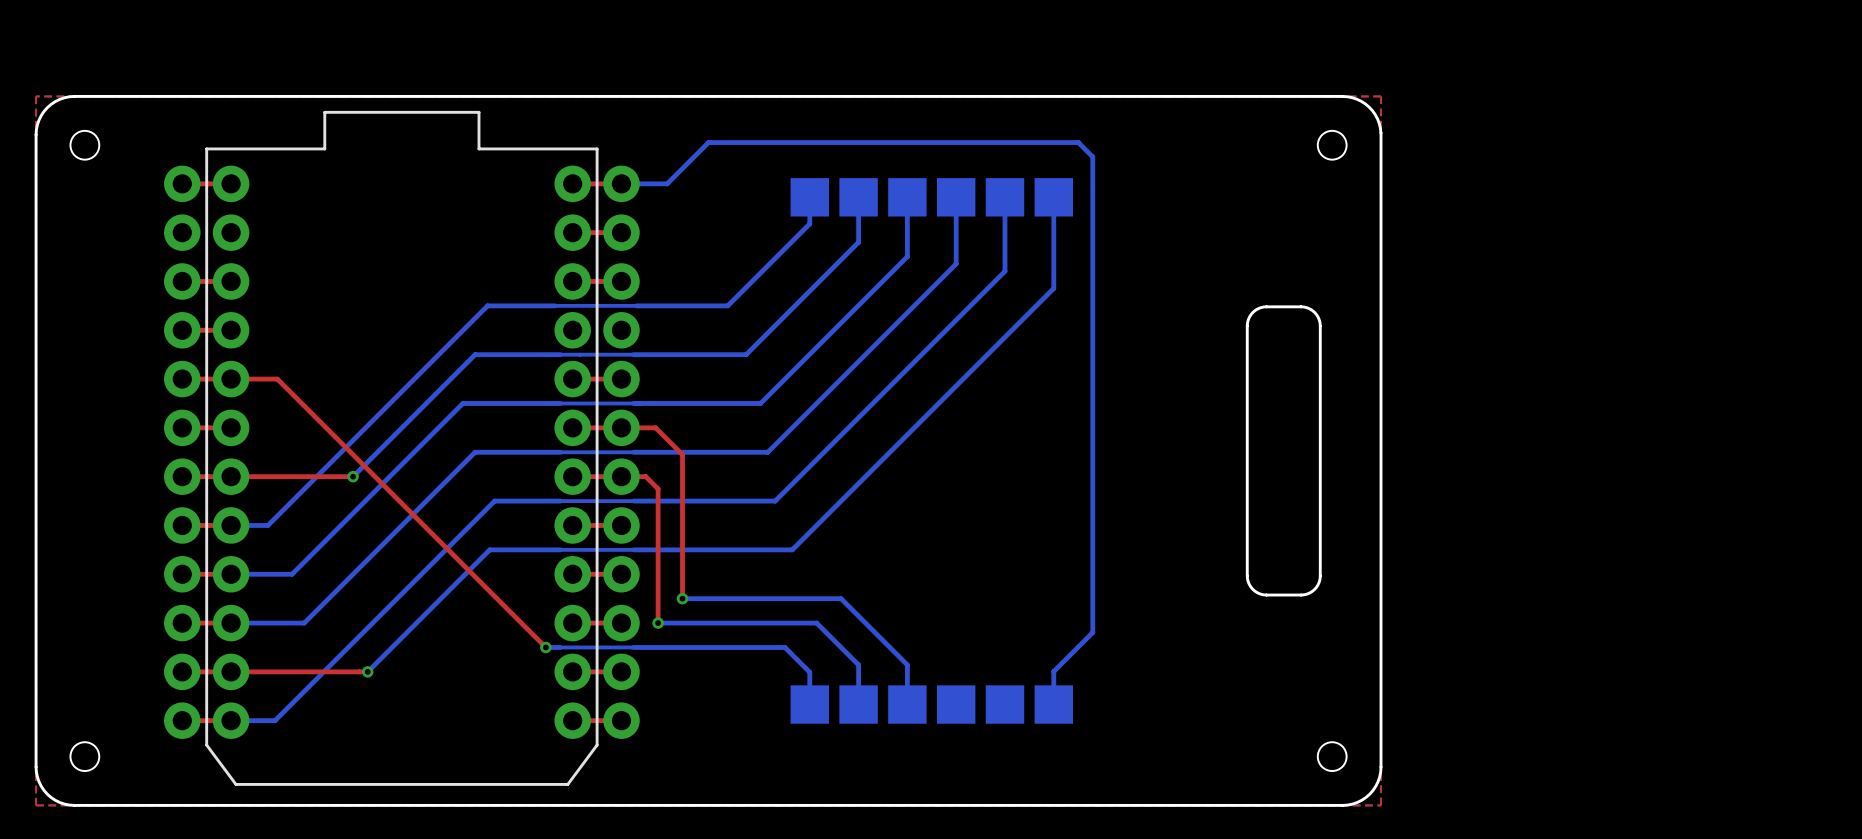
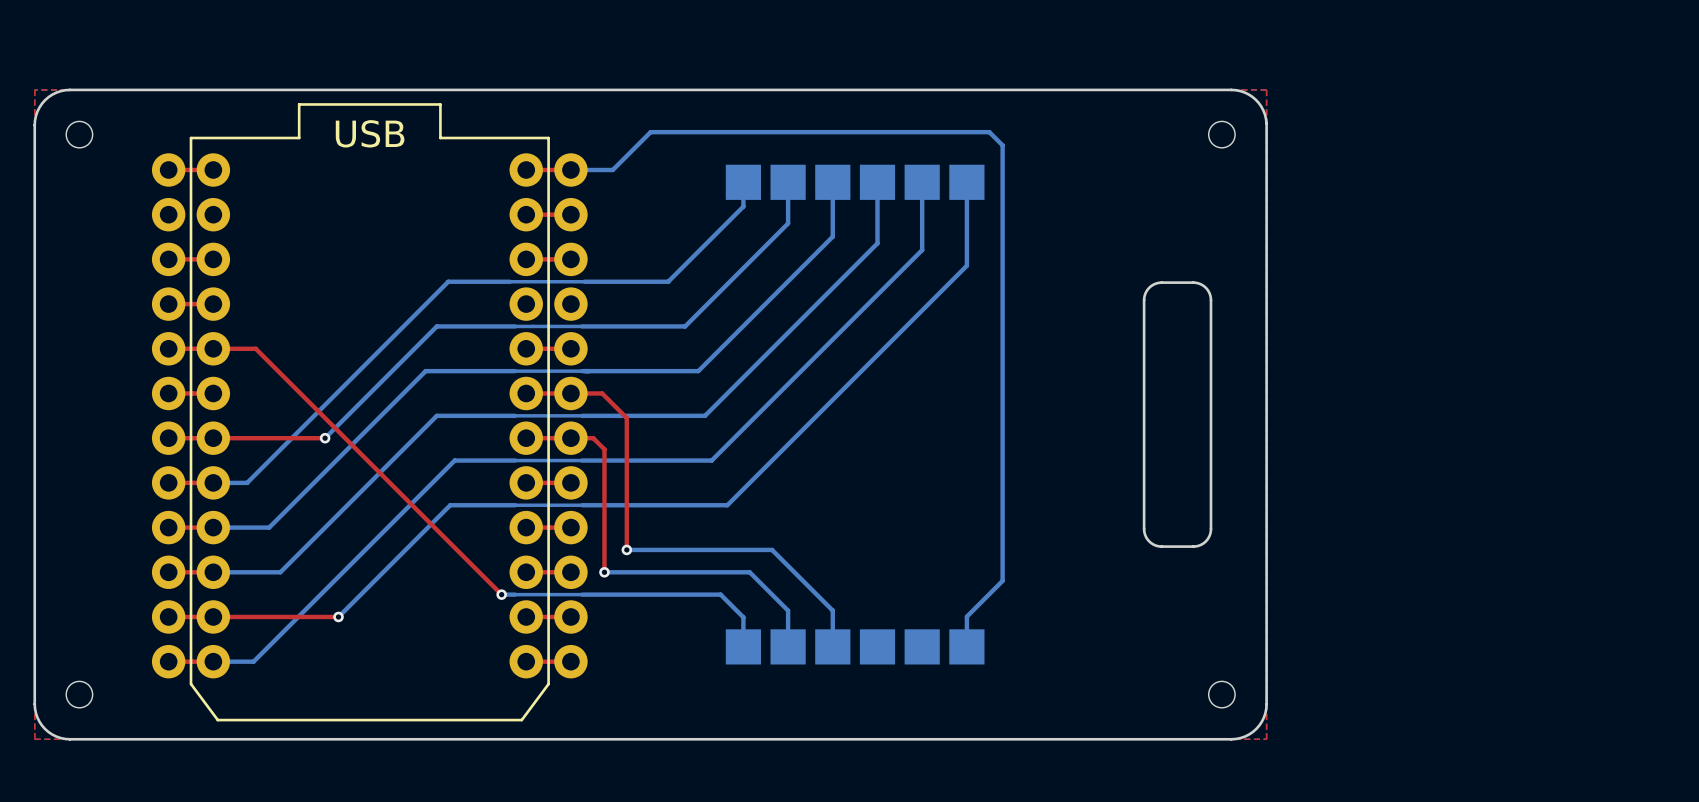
text: none -> USB (370, 133)

